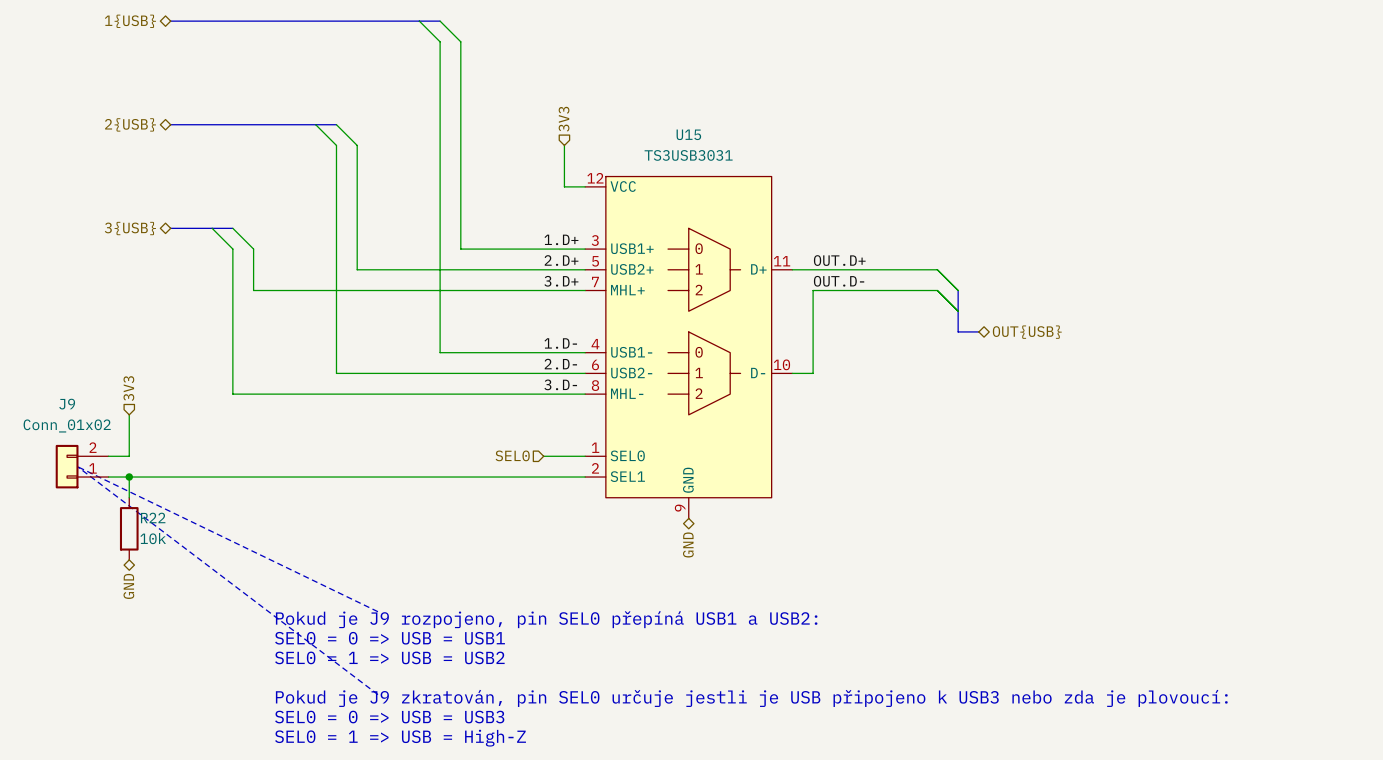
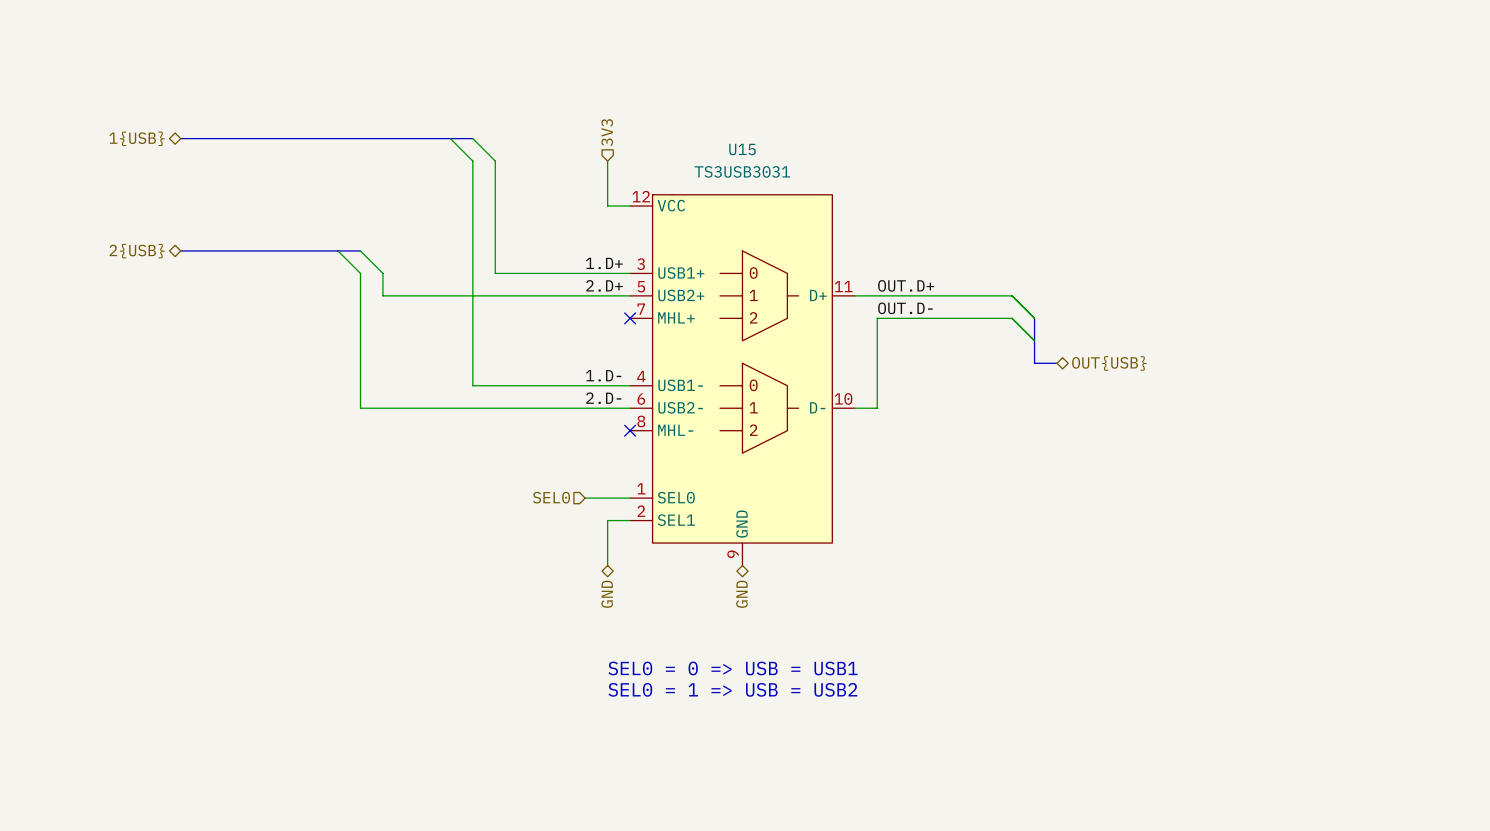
hierarchical label: 1{USB} (130, 21) -> none
bus: (170, 21) (440, 21) -> none
wire: (419, 21) (440, 41) (440, 145) -> (450, 138) (472, 161)
wire: (440, 21) (460, 41) (460, 145) -> (472, 138) (495, 161)
hierarchical label: 2{USB} (130, 124) -> 1{USB} (137, 138)
wire: (315, 124) (336, 145) (336, 249) -> (338, 250) (360, 273)
wire: (336, 124) (357, 145) (357, 249) -> (360, 250) (382, 273)
bus: none -> (360, 138) (472, 138)
hierarchical label: 3{USB} (130, 228) -> 2{USB} (137, 251)
wire: (212, 228) (232, 249) (232, 394) (585, 394) -> none
wire: (232, 228) (253, 249) (253, 290) (585, 290) -> none
bus: none -> (248, 250) (360, 250)
label: 3.D+ (561, 281) -> none
no-connect mark: none -> (630, 318)
label: 3.D- (560, 384) -> none
hierarchical label: 3V3 (128, 388) -> none
no-connect mark: none -> (630, 430)
wire: (129, 414) (129, 456) (108, 456) -> none
J9: Conn_01x02 (82, 466) -> none
wire: (108, 477) (564, 477) -> (607, 565) (607, 520)
wire: (129, 477) (129, 497) -> none
junction: (129, 477) -> none
R22: 10k (129, 528) -> none
hierarchical label: none -> GND (607, 594)
hierarchical label: GND (128, 586) -> none
line: (377, 611) (77, 466) (377, 694) -> none
text: none -> SEL0 = 0 => USB = USB1 (733, 668)
text: Pokud je J9 rozpojeno, pin SEL0 přepíná USB1 a USB2: (546, 619) -> none
text: none -> SEL0 = 1 => USB = USB2 (732, 689)
text: SEL0 = 0 => USB = USB1 (390, 638) -> none
text: SEL0 = 1 => USB = USB2 (389, 657) -> none
text: Pokud je J9 zkratován, pin SEL0 určuje jestli je USB připojeno k USB3 nebo zda je plovoucí: (751, 698) -> none
text: SEL0 = 0 => USB = USB3 (389, 717) -> none
text: SEL0 = 1 => USB = High-Z (400, 738) -> none

